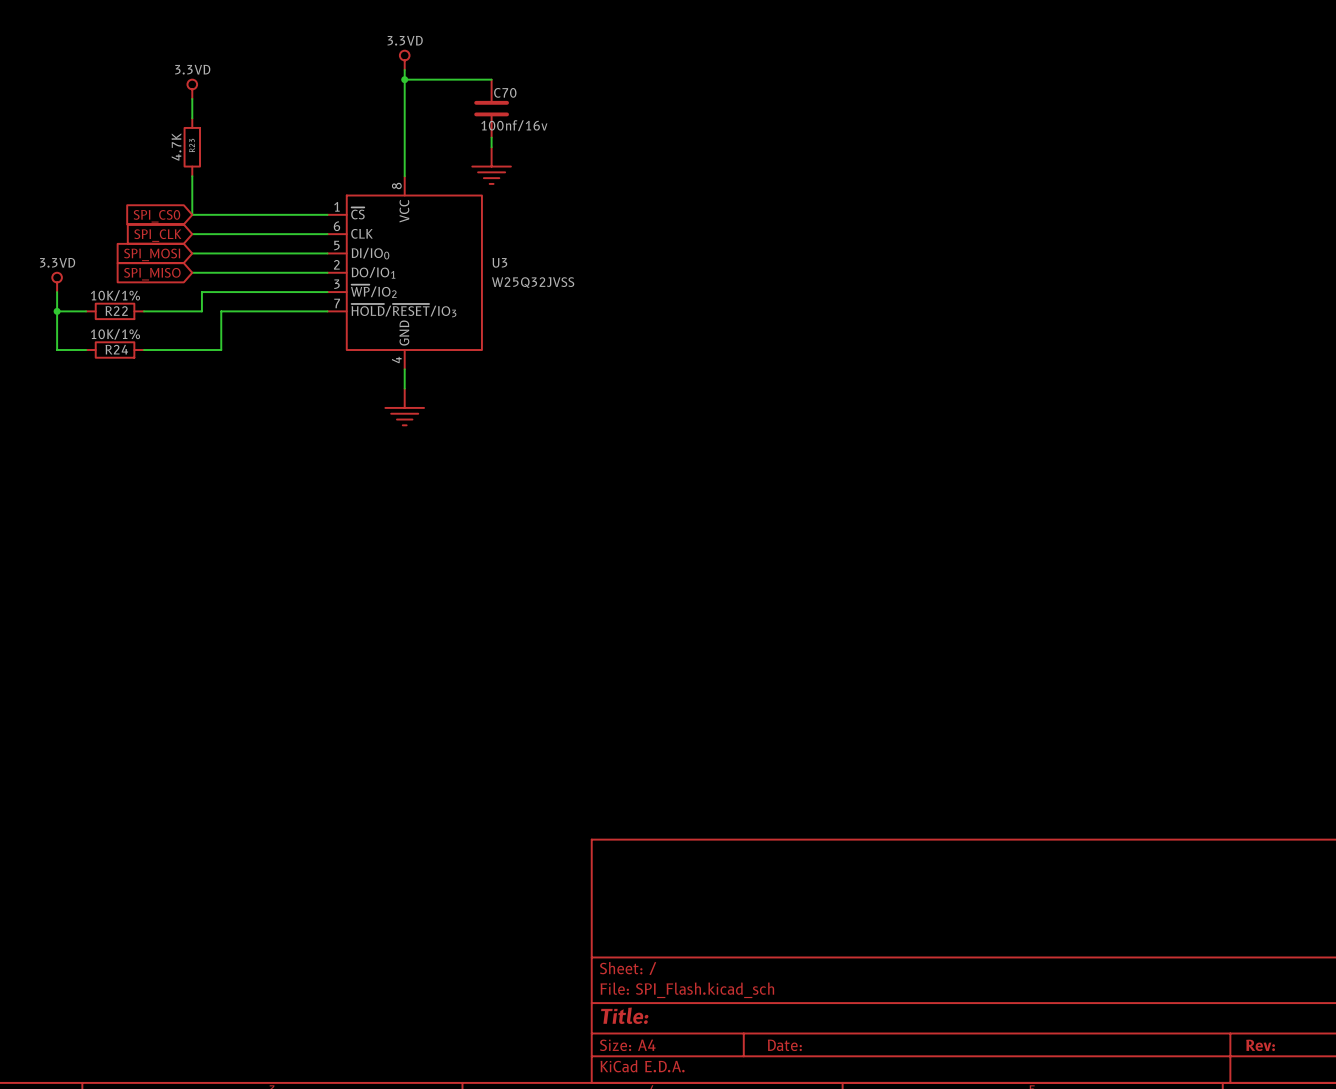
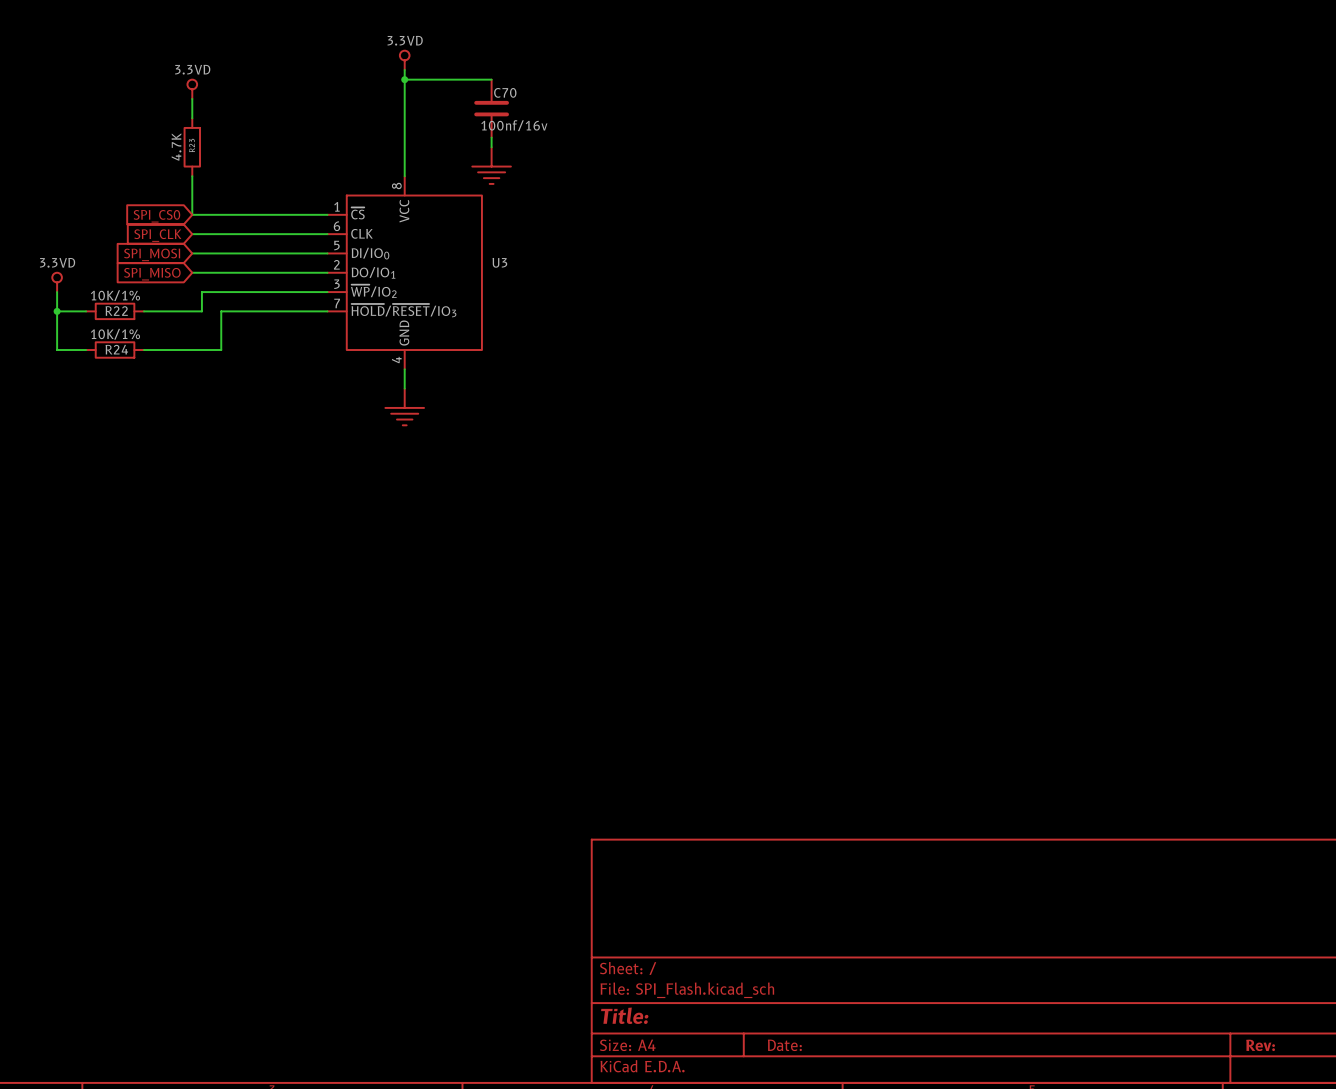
U3 value: W25Q32JVSS (533, 282) -> none

